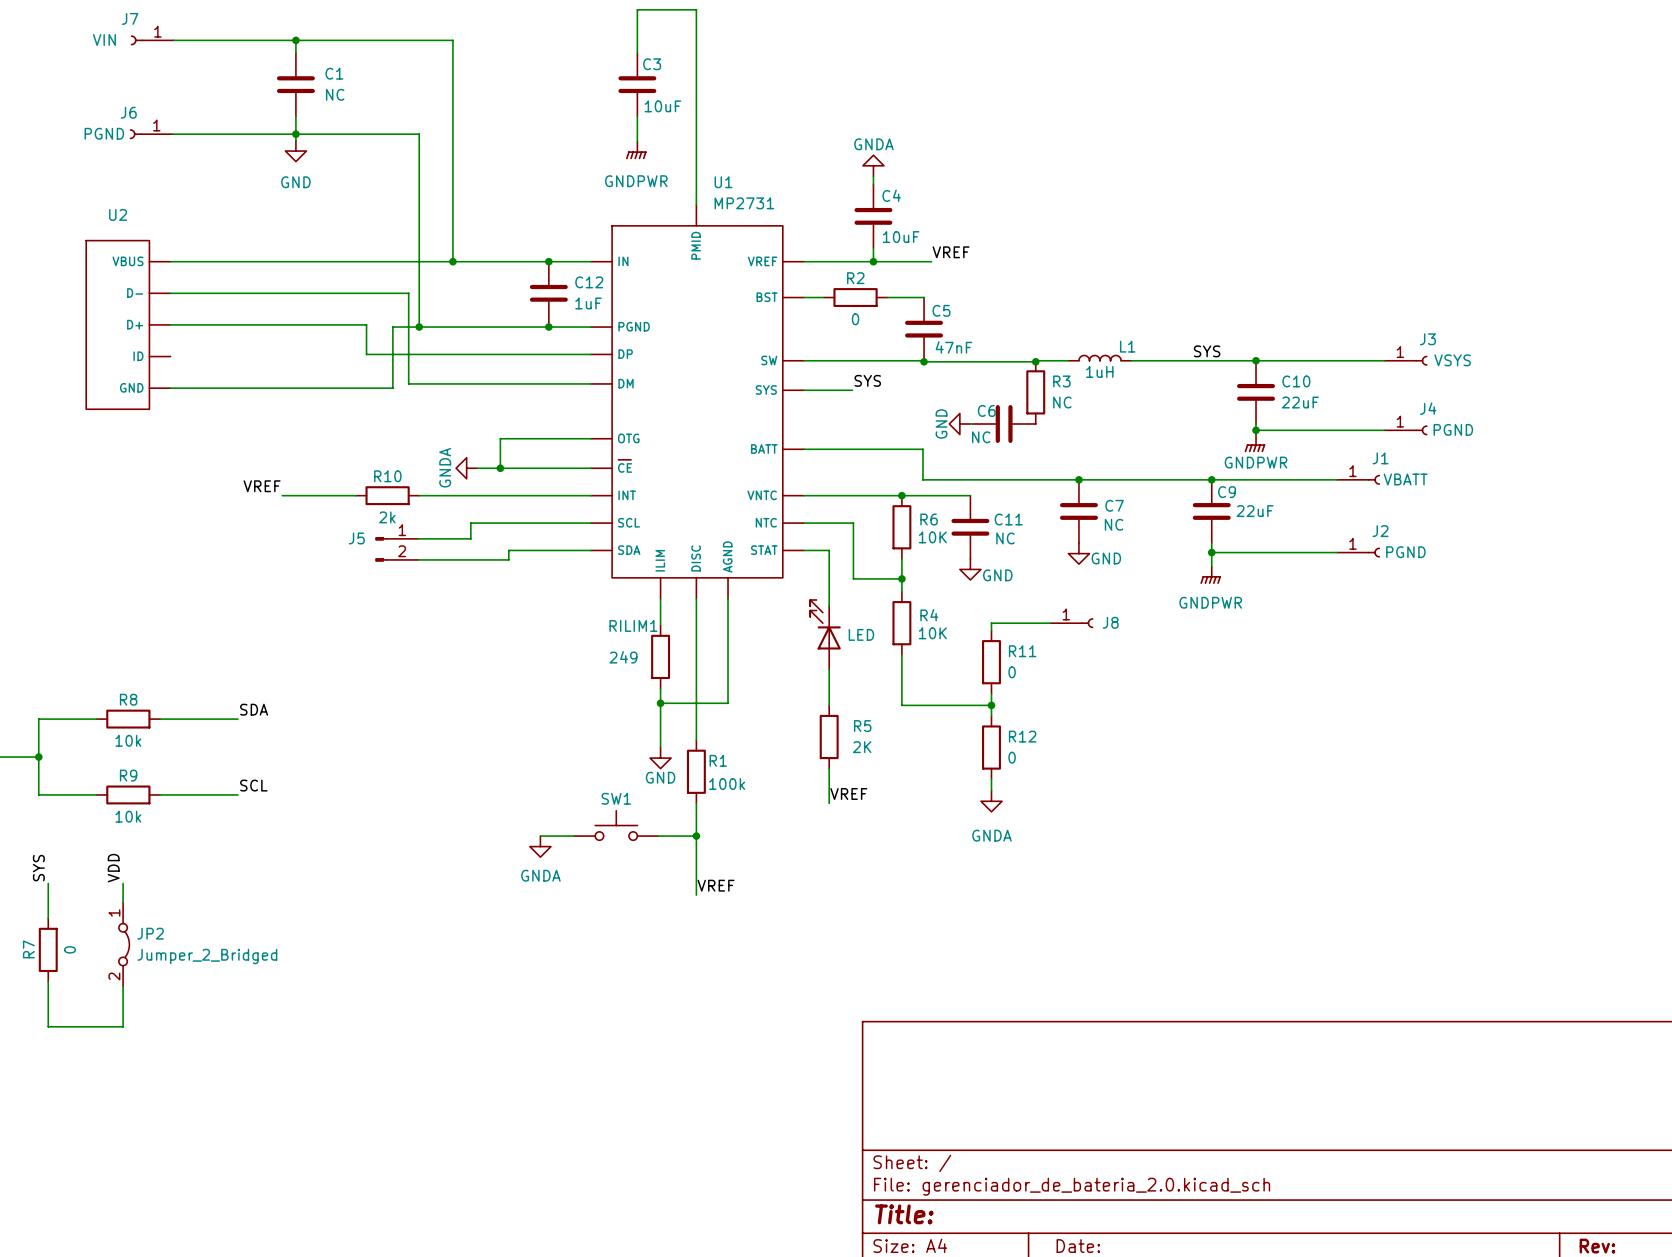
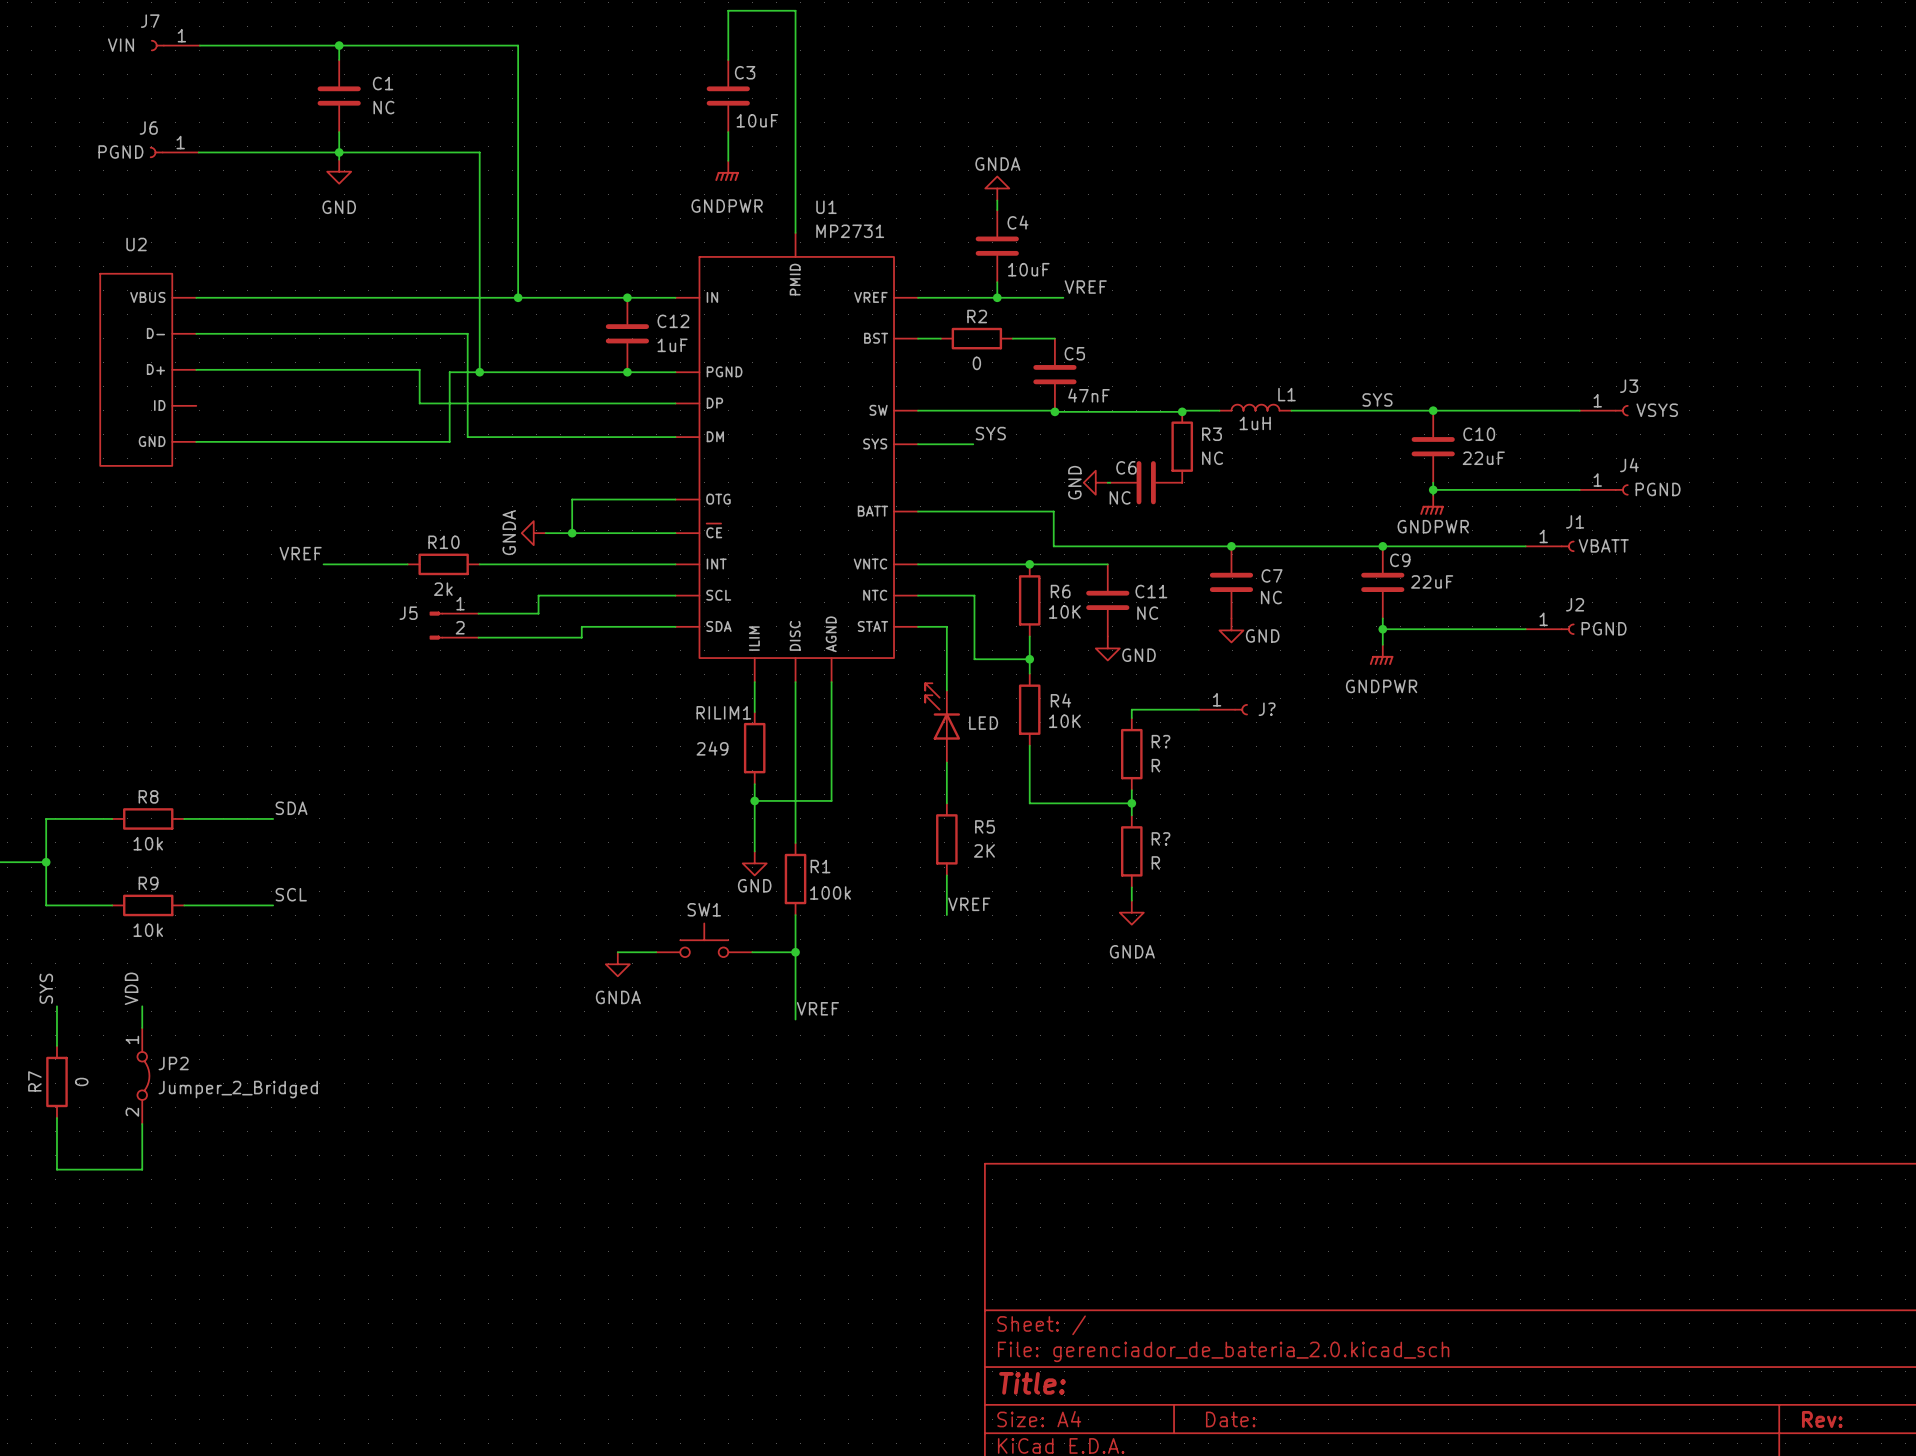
J8 name: J8 (1110, 622) -> J? (1267, 709)
R11 name: R11 (1022, 651) -> R? (1160, 741)
R11 value: 0 (1012, 672) -> R (1155, 765)
R12 name: R12 (1022, 736) -> R? (1160, 838)
R12 value: 0 (1012, 757) -> R (1155, 862)

